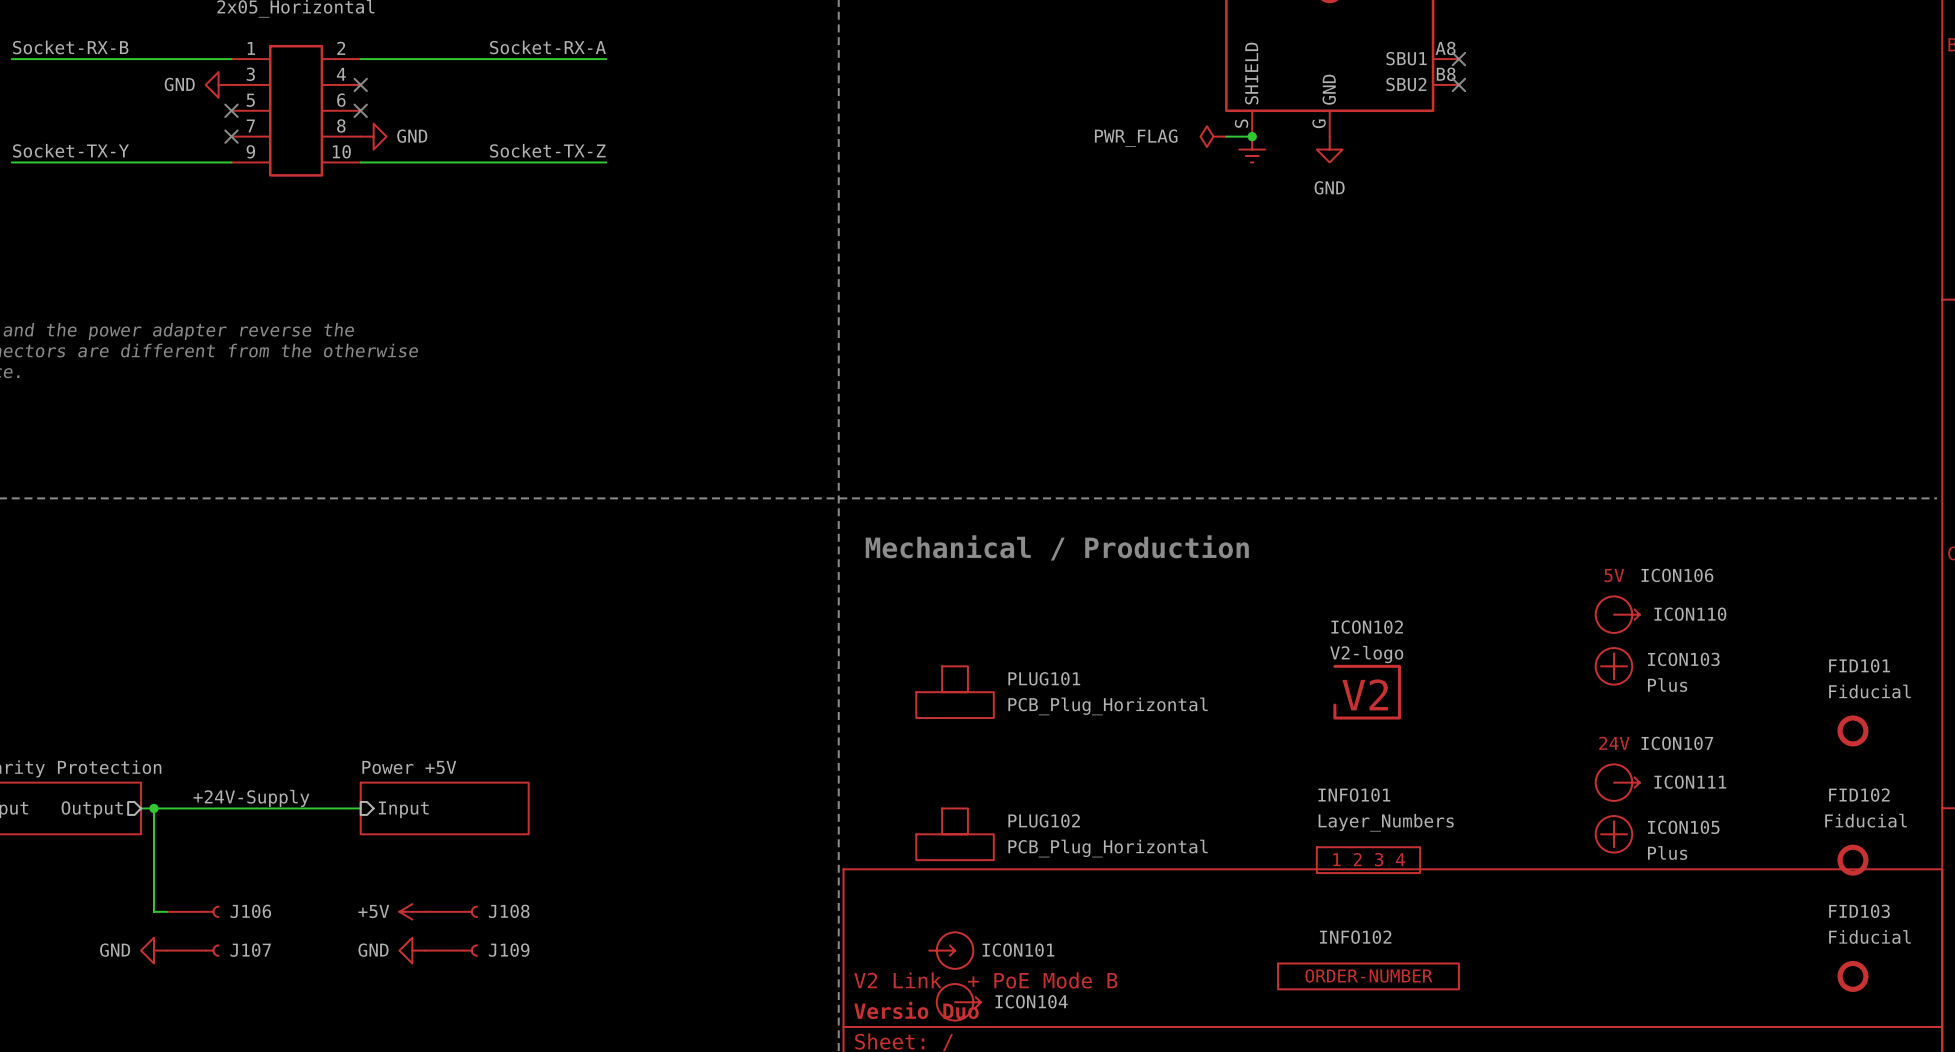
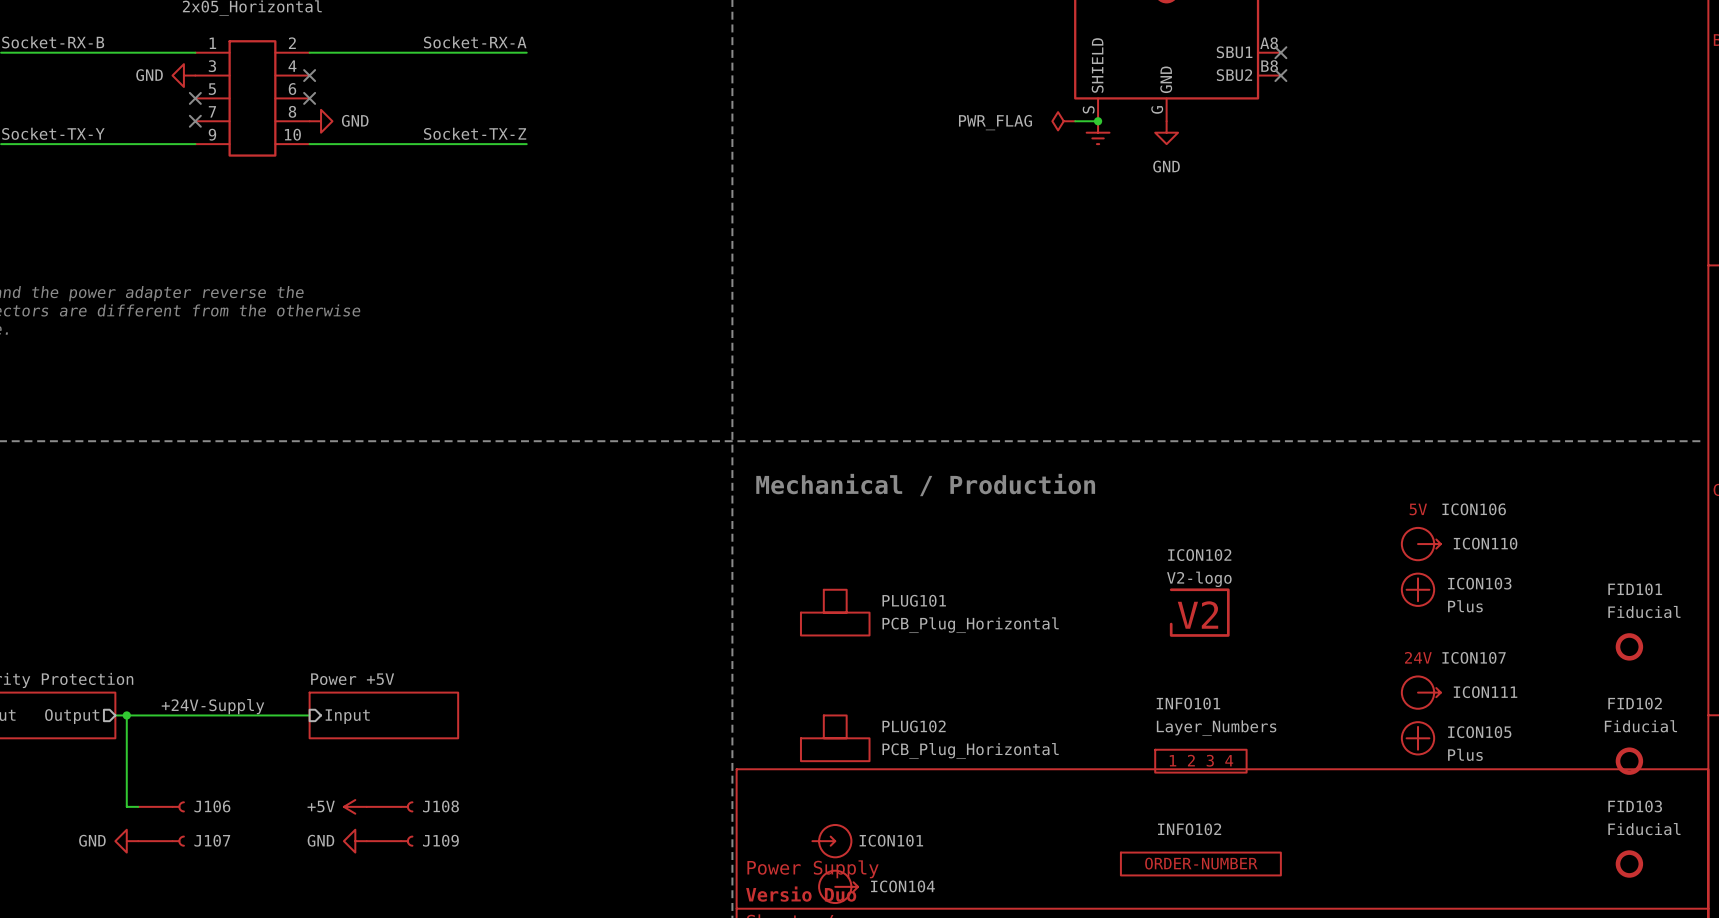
title block: V2 Link + PoE Mode B (985, 980) -> Power Supply (813, 869)

